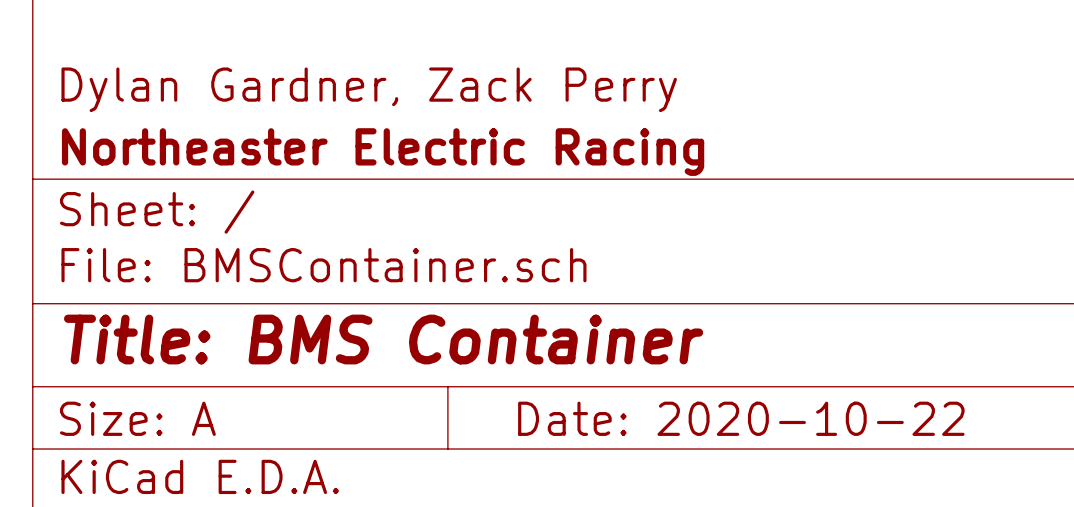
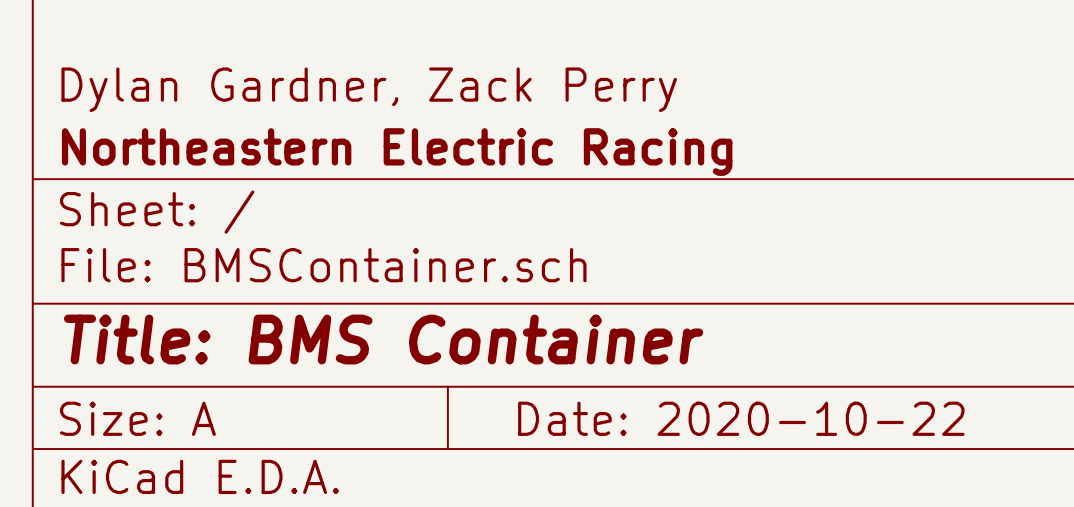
title block: Northeaster Electric Racing (383, 152) -> Northeastern Electric Racing (397, 152)

